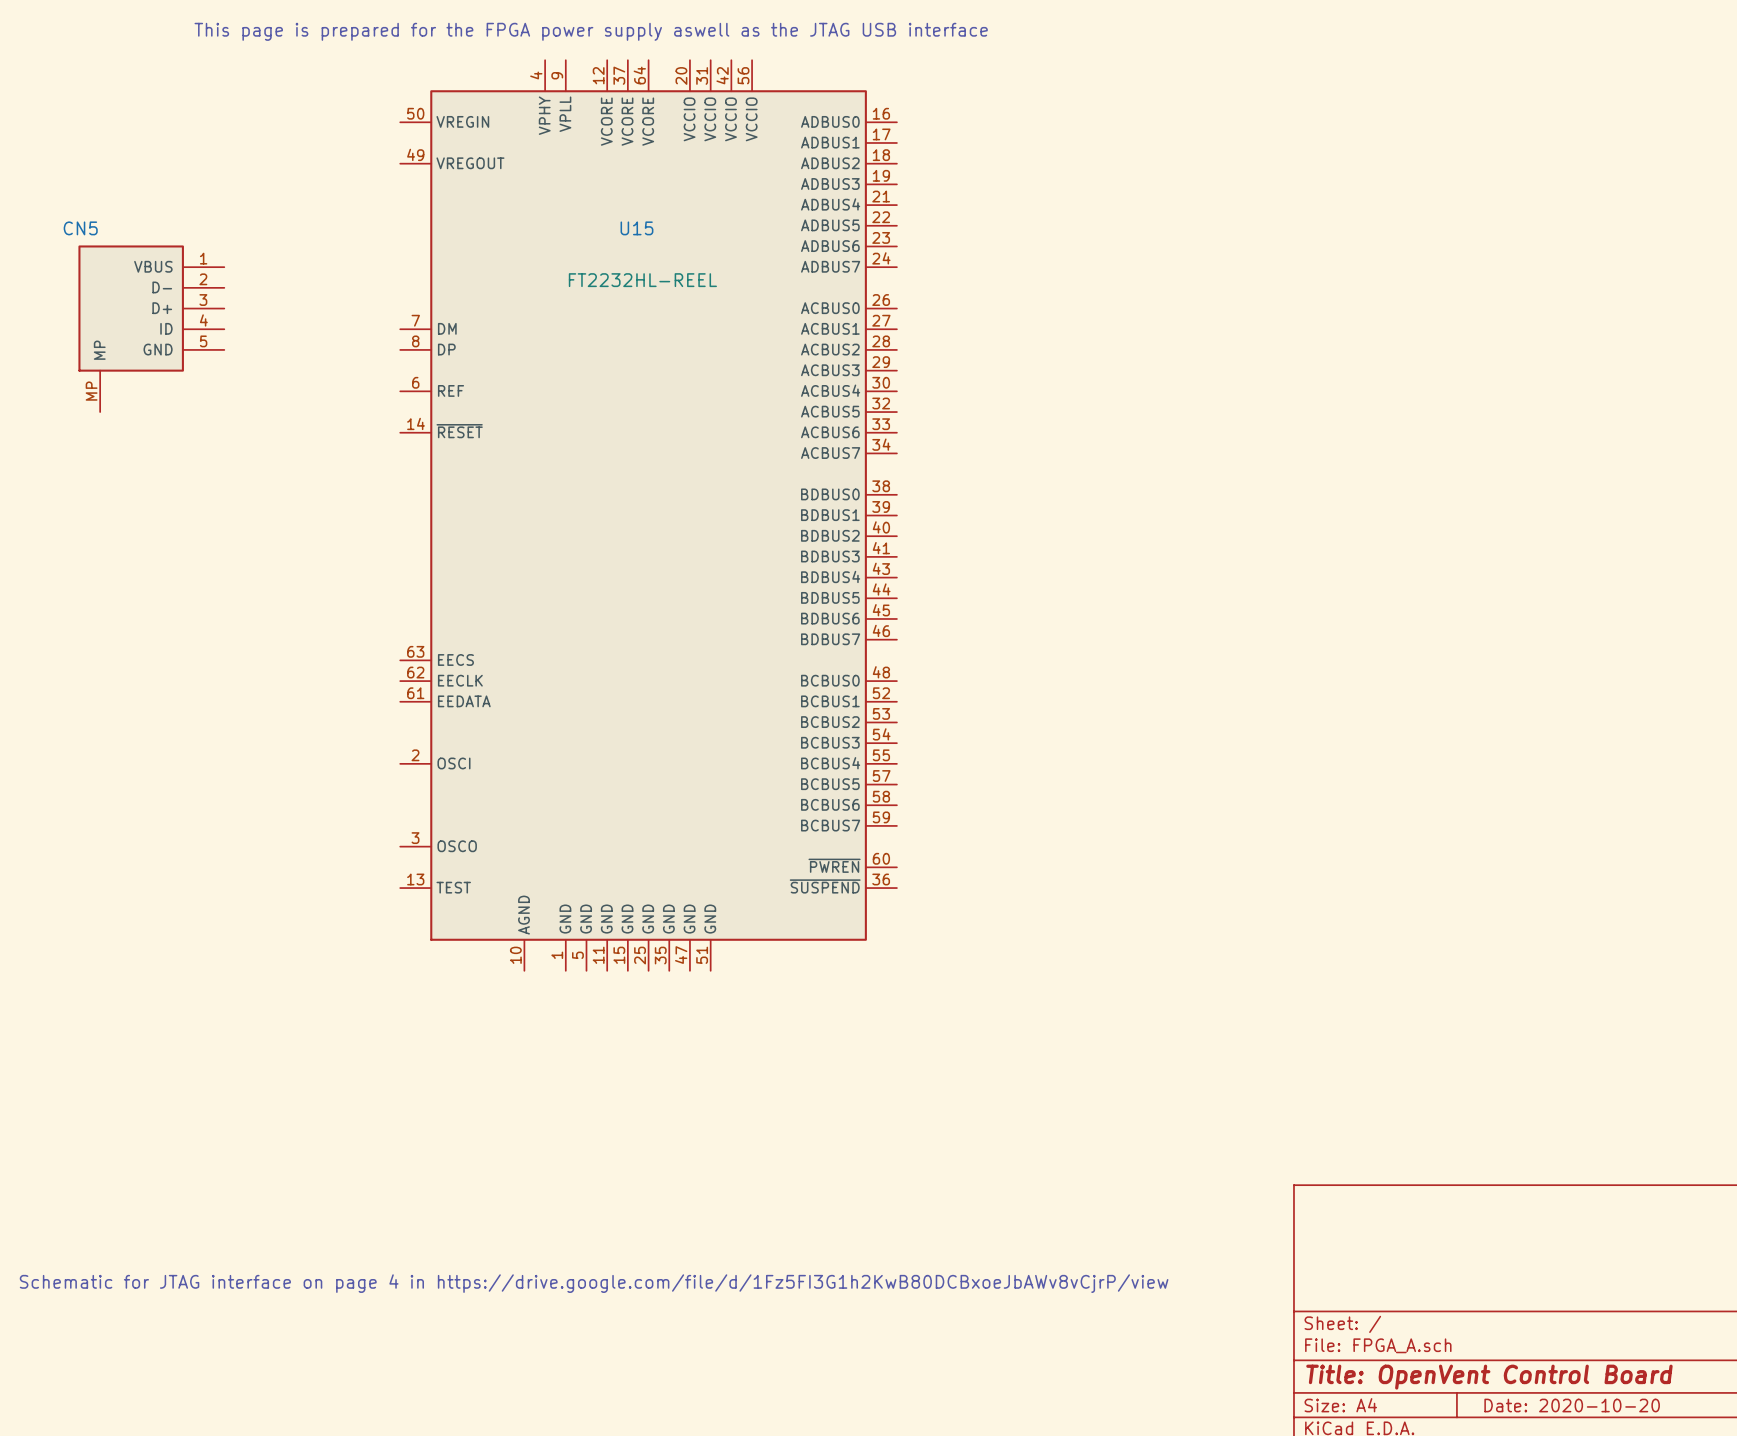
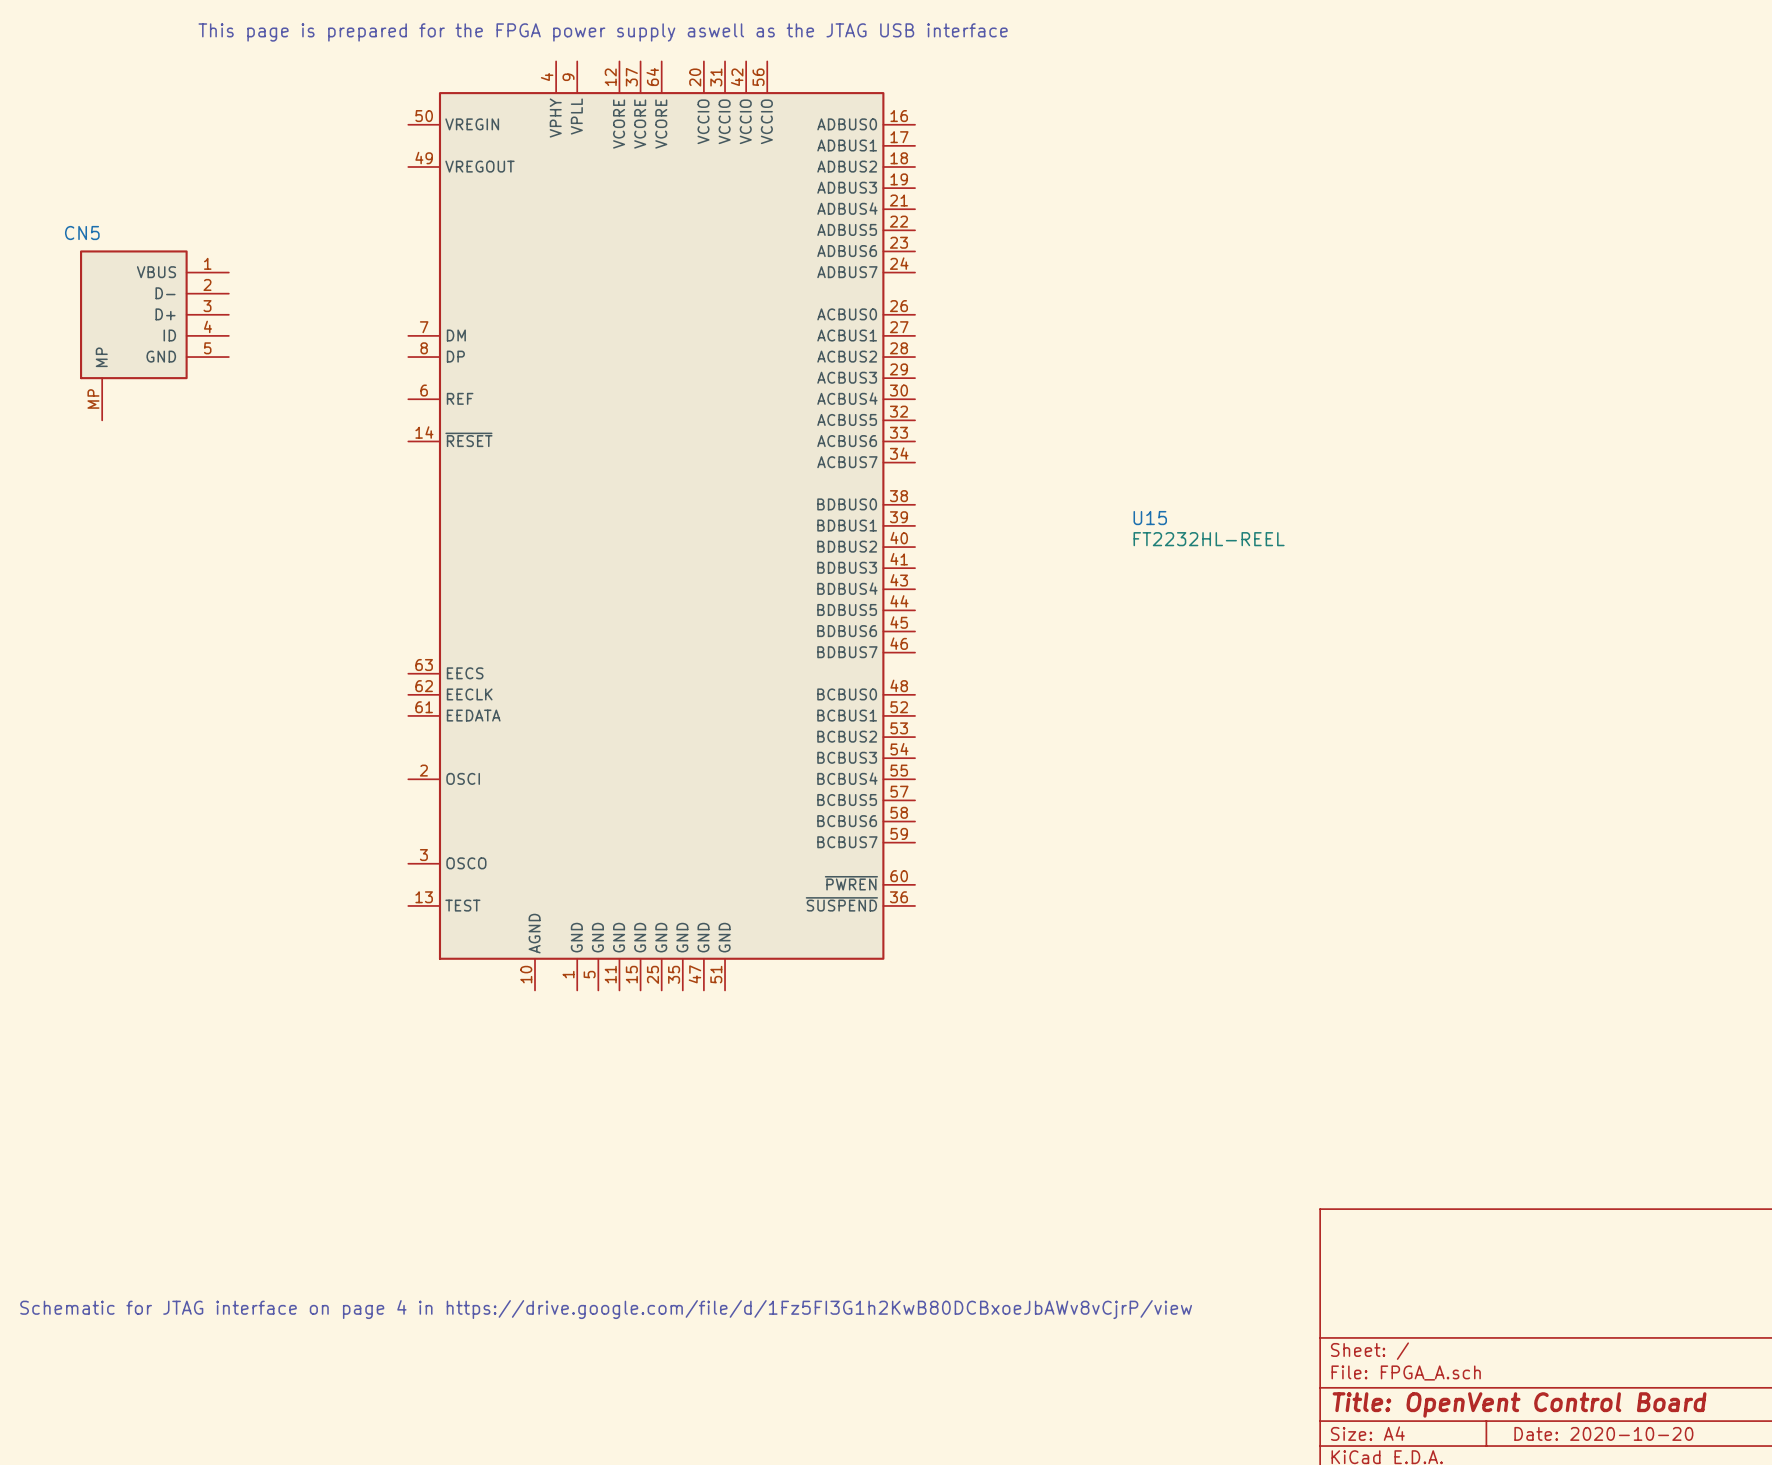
U15 name position: U15 (636, 228) -> U15 (1150, 518)
U15 value position: FT2232HL-REEL (642, 280) -> FT2232HL-REEL (1209, 539)

